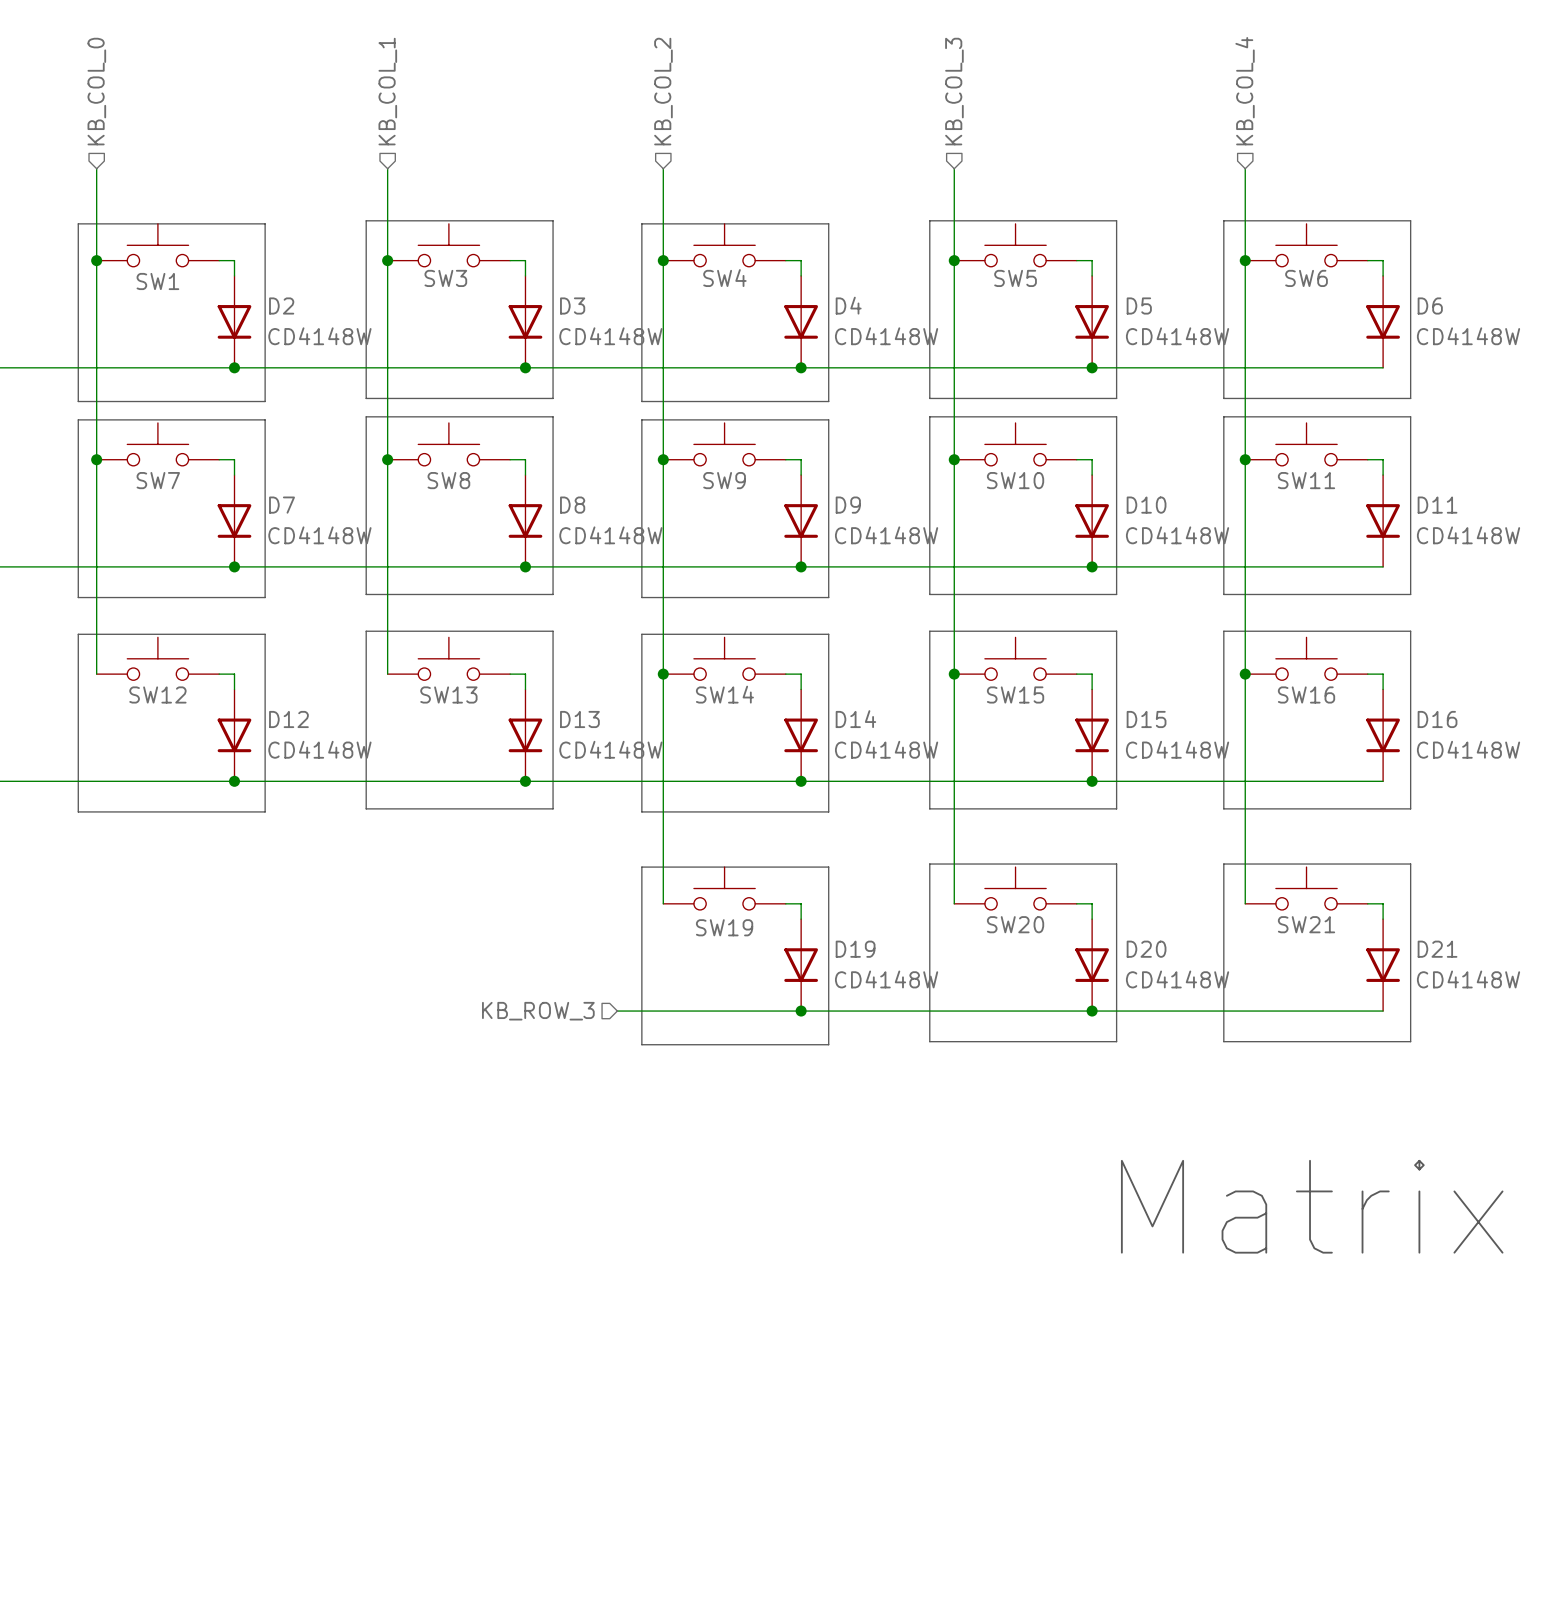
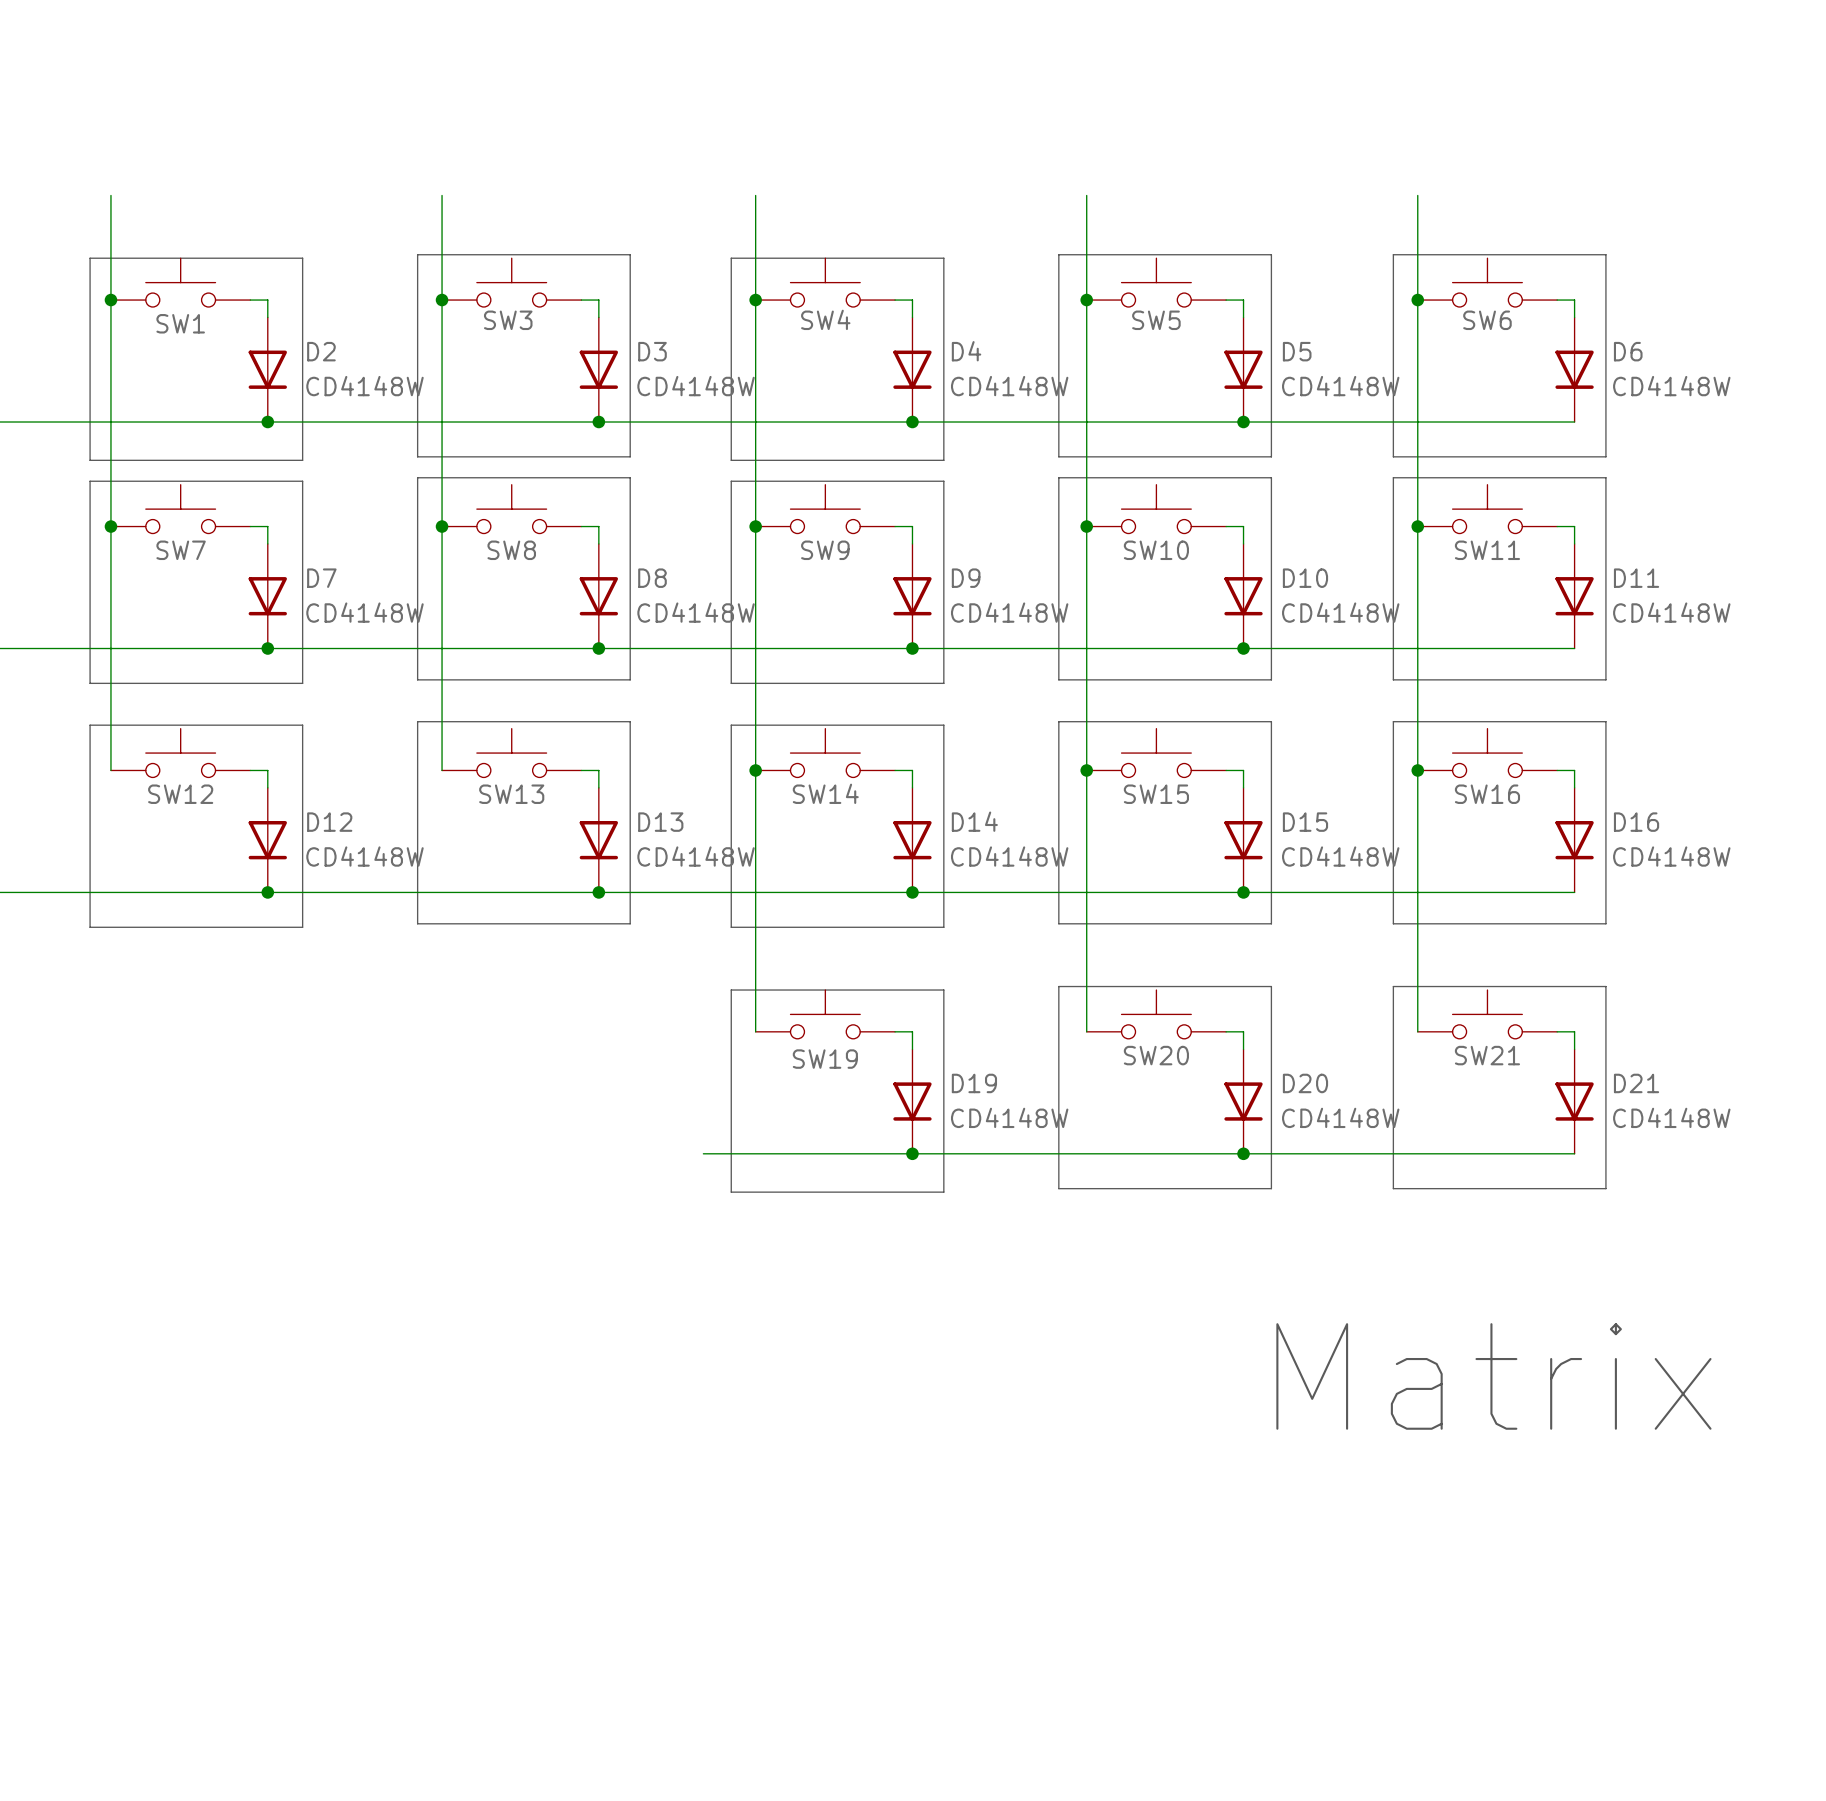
hierarchical label: KB_COL_0 (96, 91) -> none
hierarchical label: KB_COL_1 (387, 91) -> none
hierarchical label: KB_COL_2 (663, 91) -> none
hierarchical label: KB_COL_3 (954, 91) -> none
hierarchical label: KB_COL_4 (1245, 91) -> none
hierarchical label: KB_ROW_3 (538, 1011) -> none

